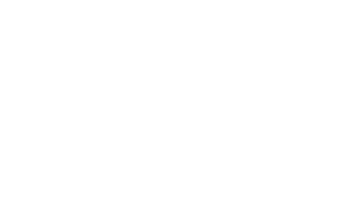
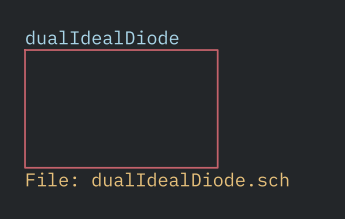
sheet dualIdealDiode: none -> File: dualIdealDiode.sch (121, 108)

